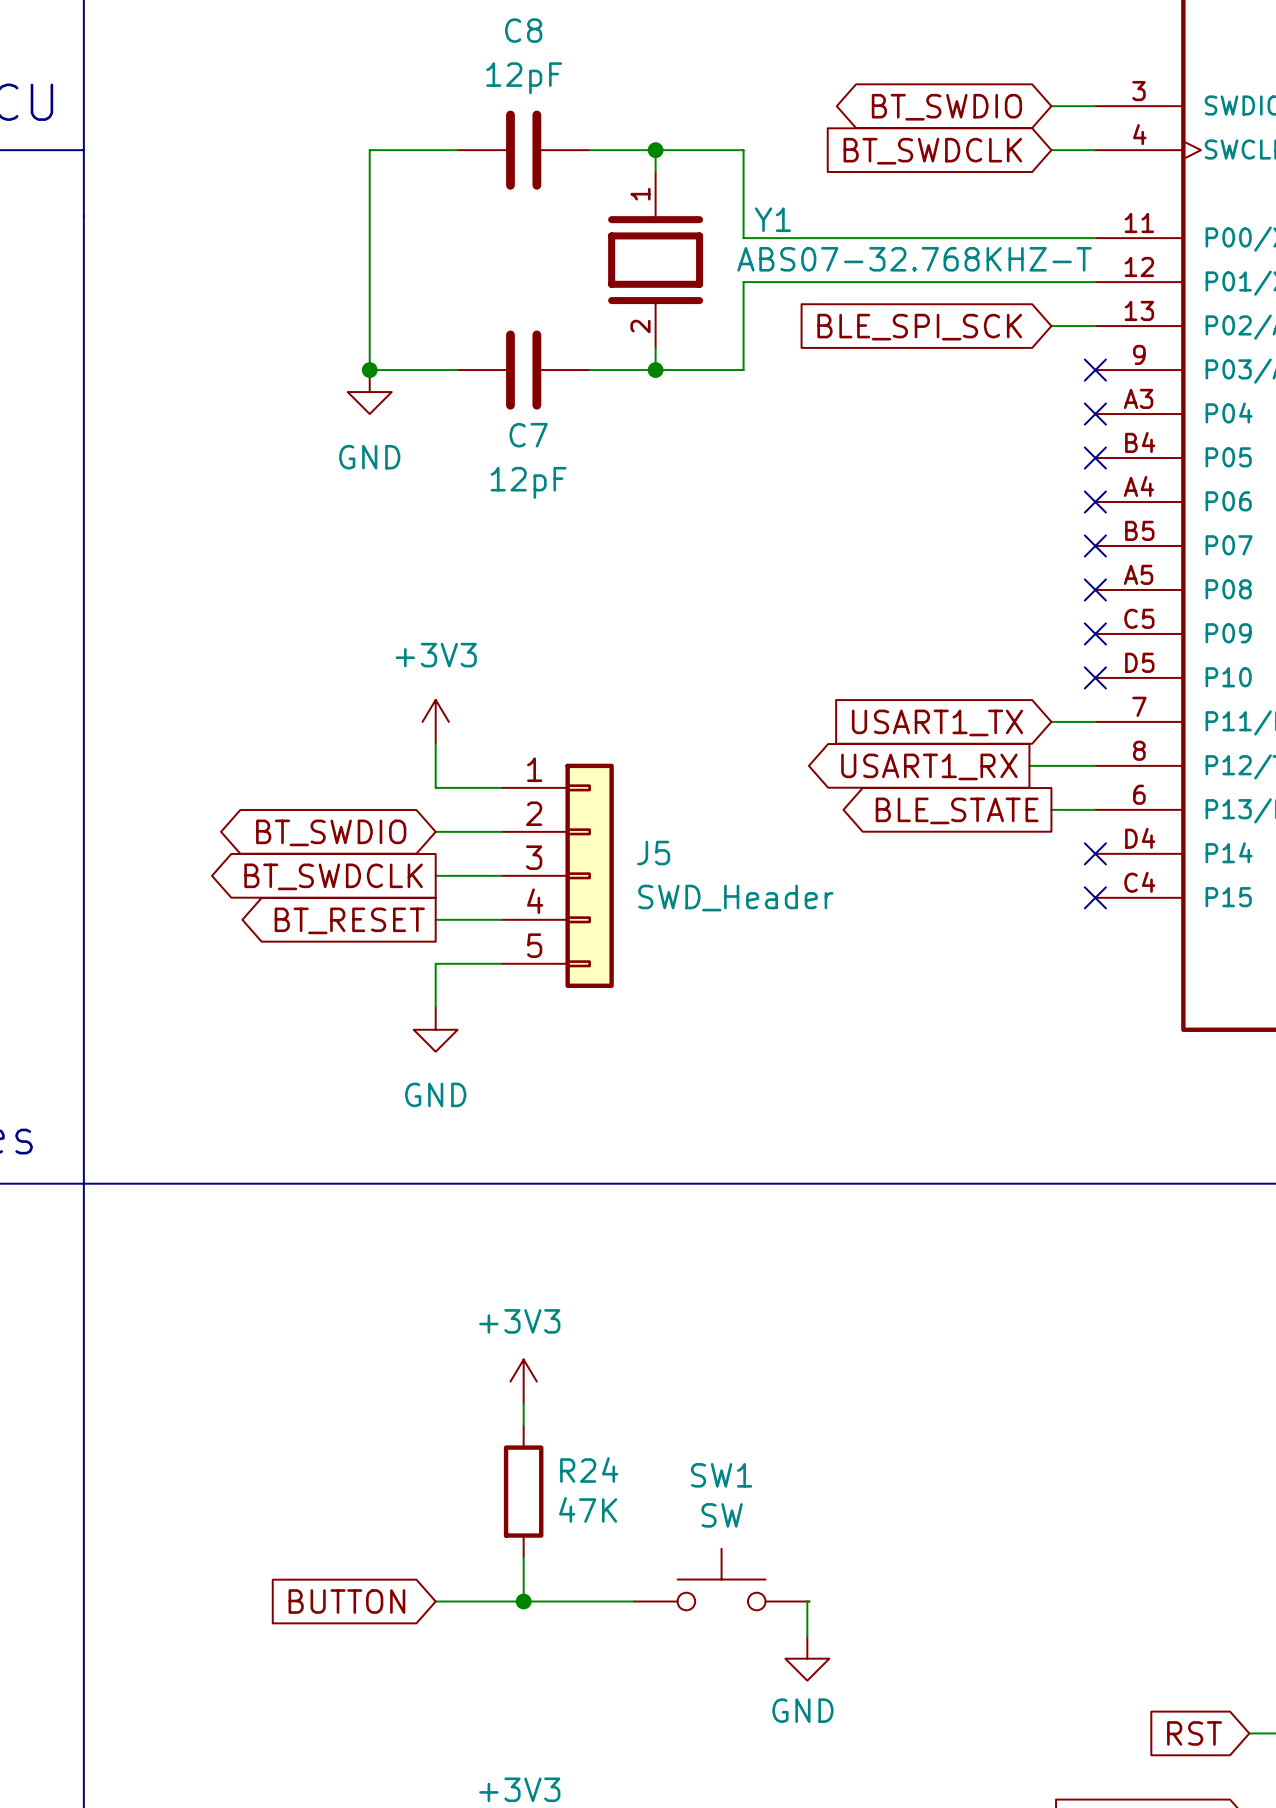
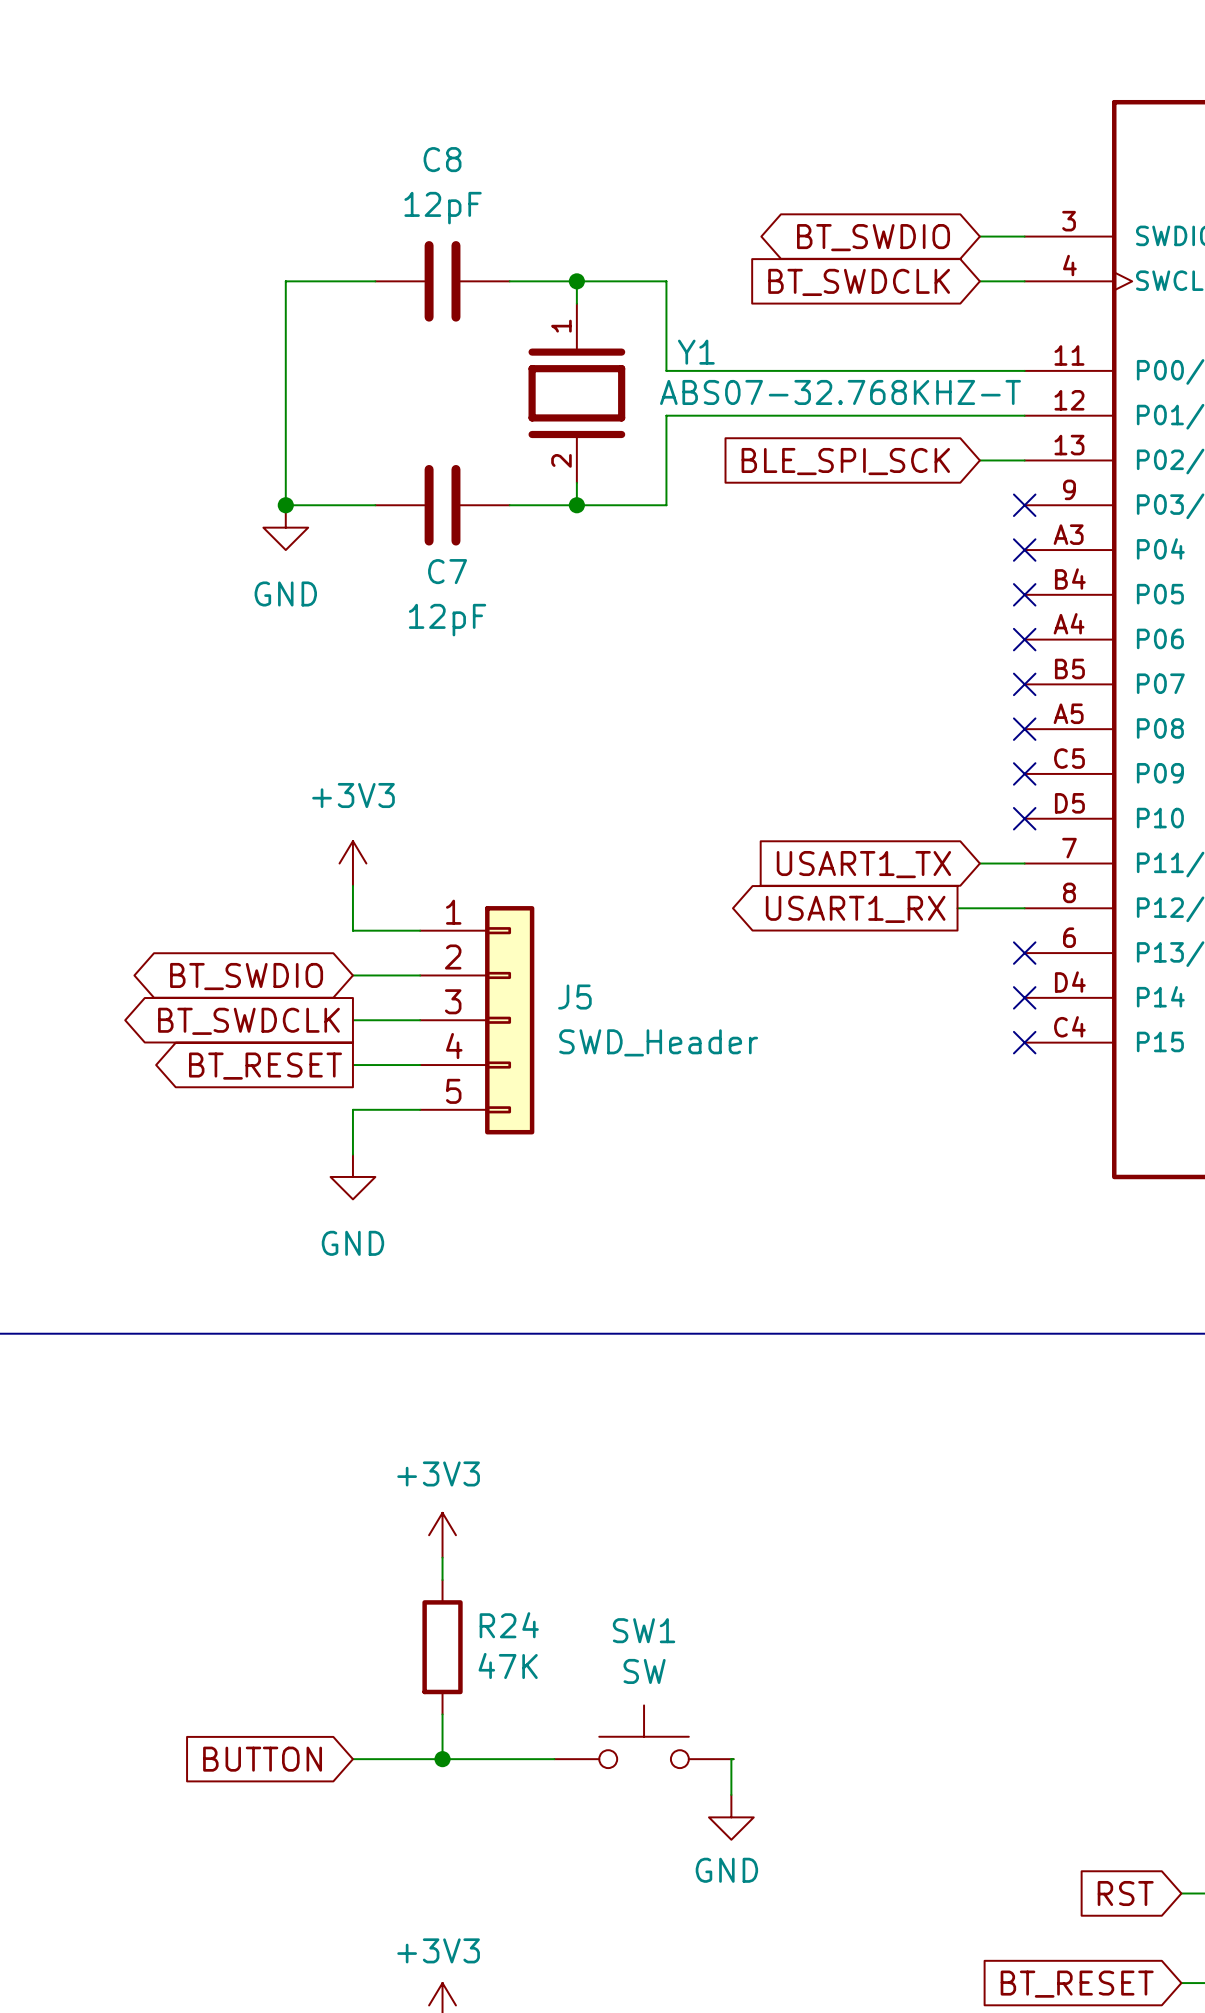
wire: (1051, 809) (1095, 809) -> none
no-connect mark: none -> (1024, 953)
global label: BLE_STATE (957, 810) -> none

